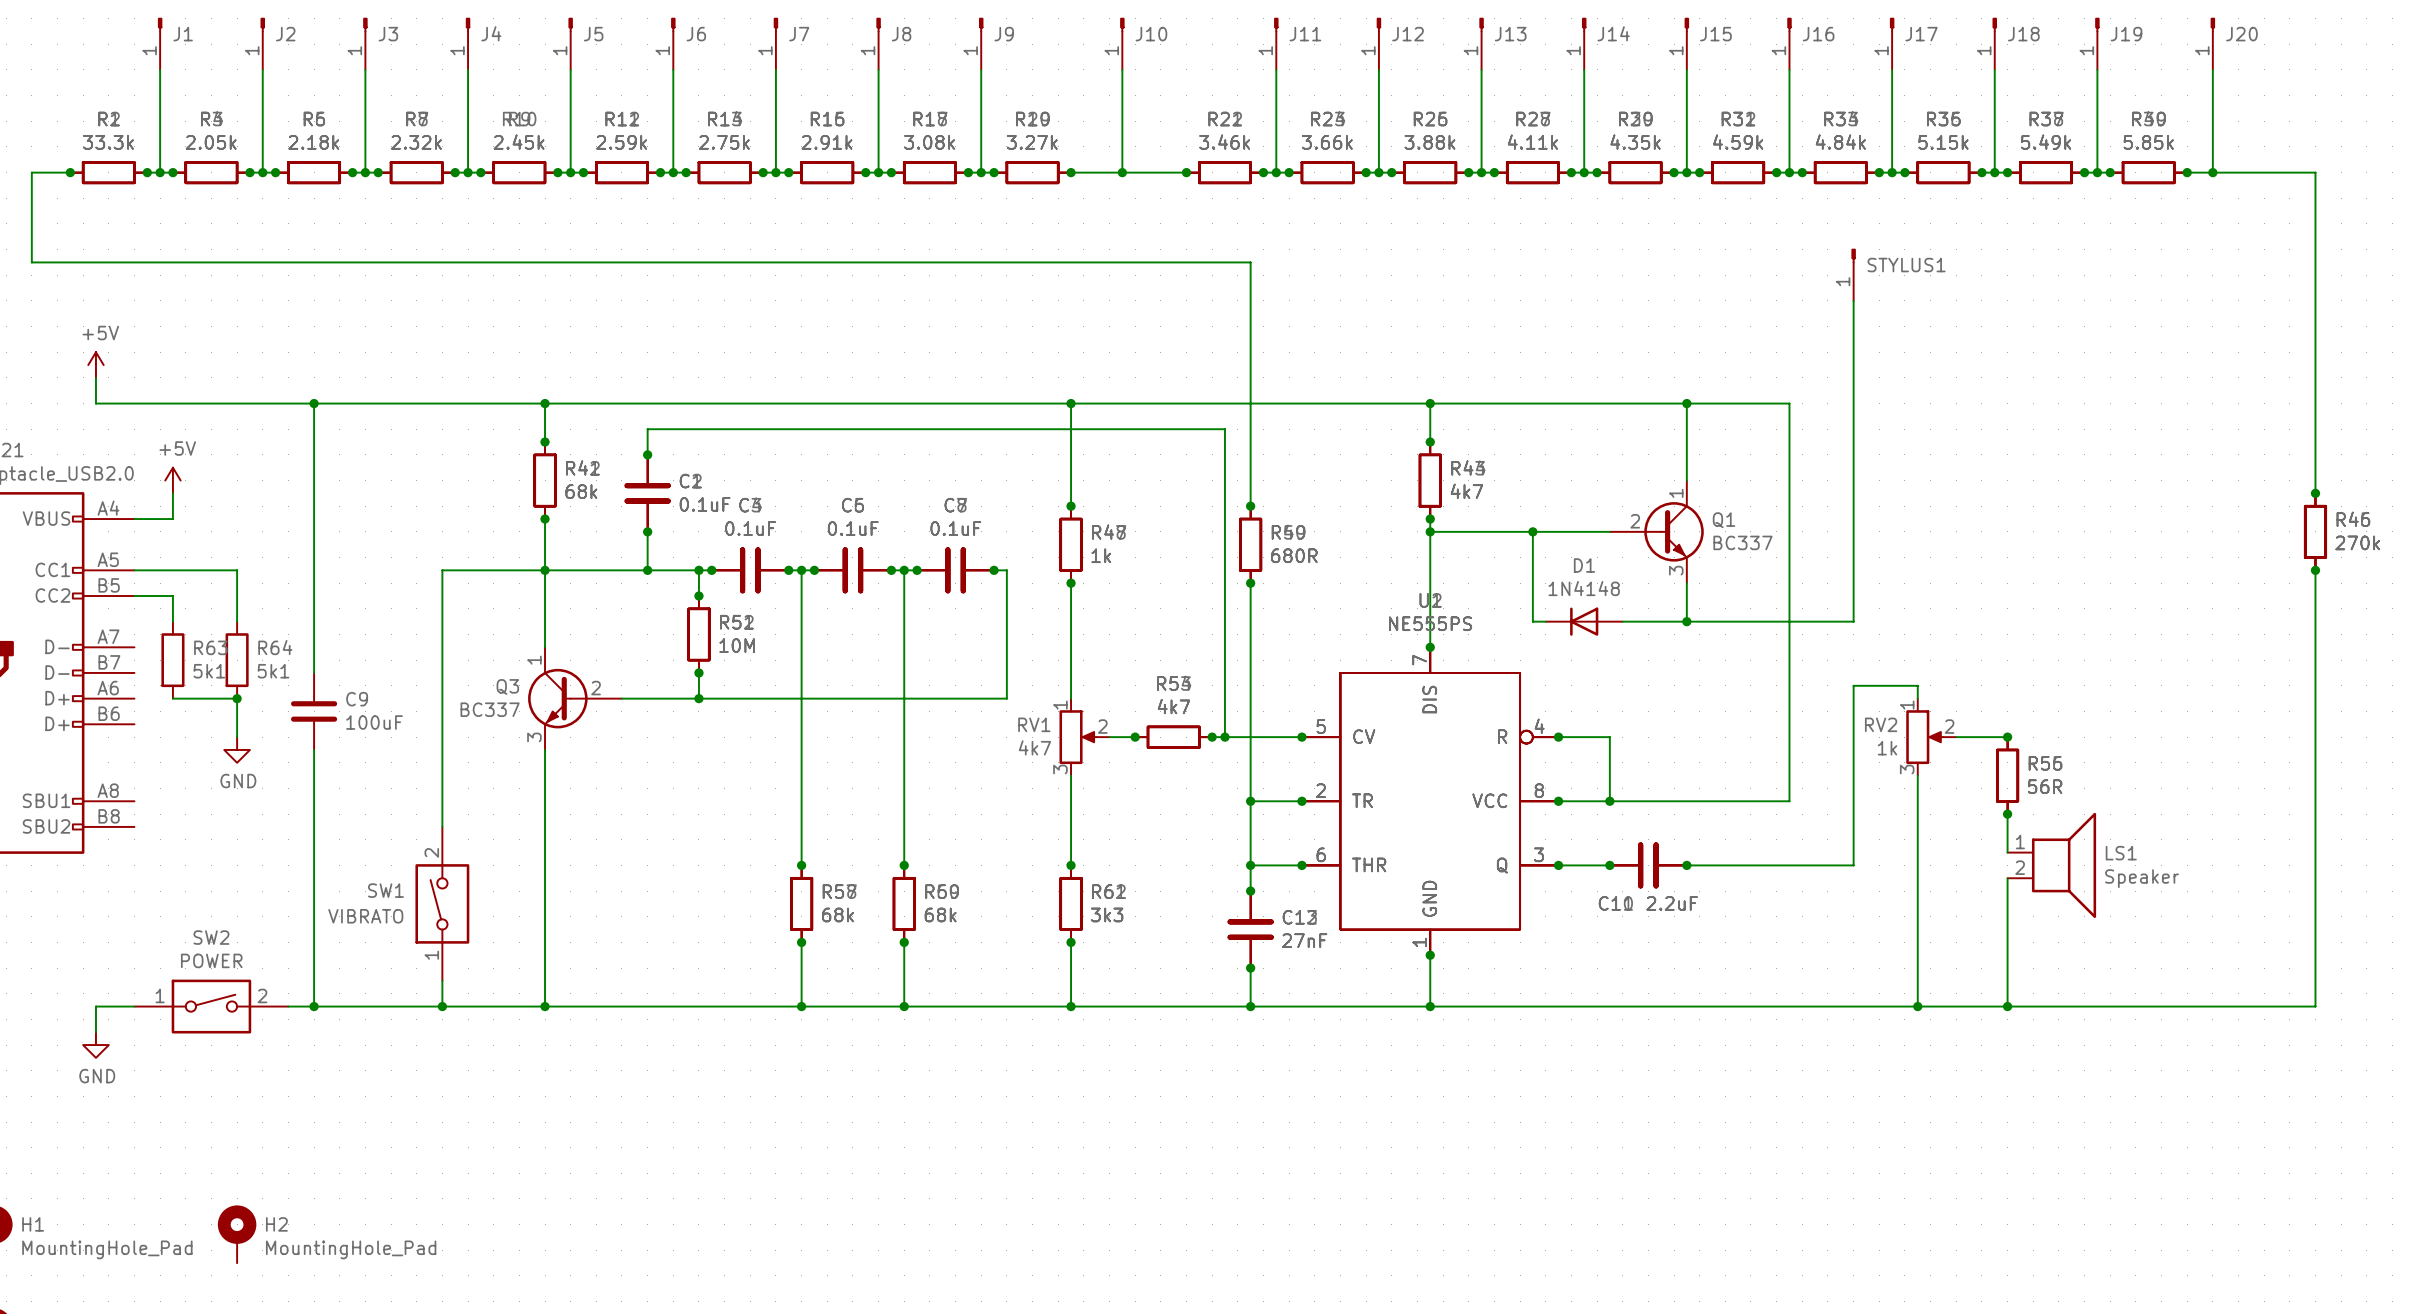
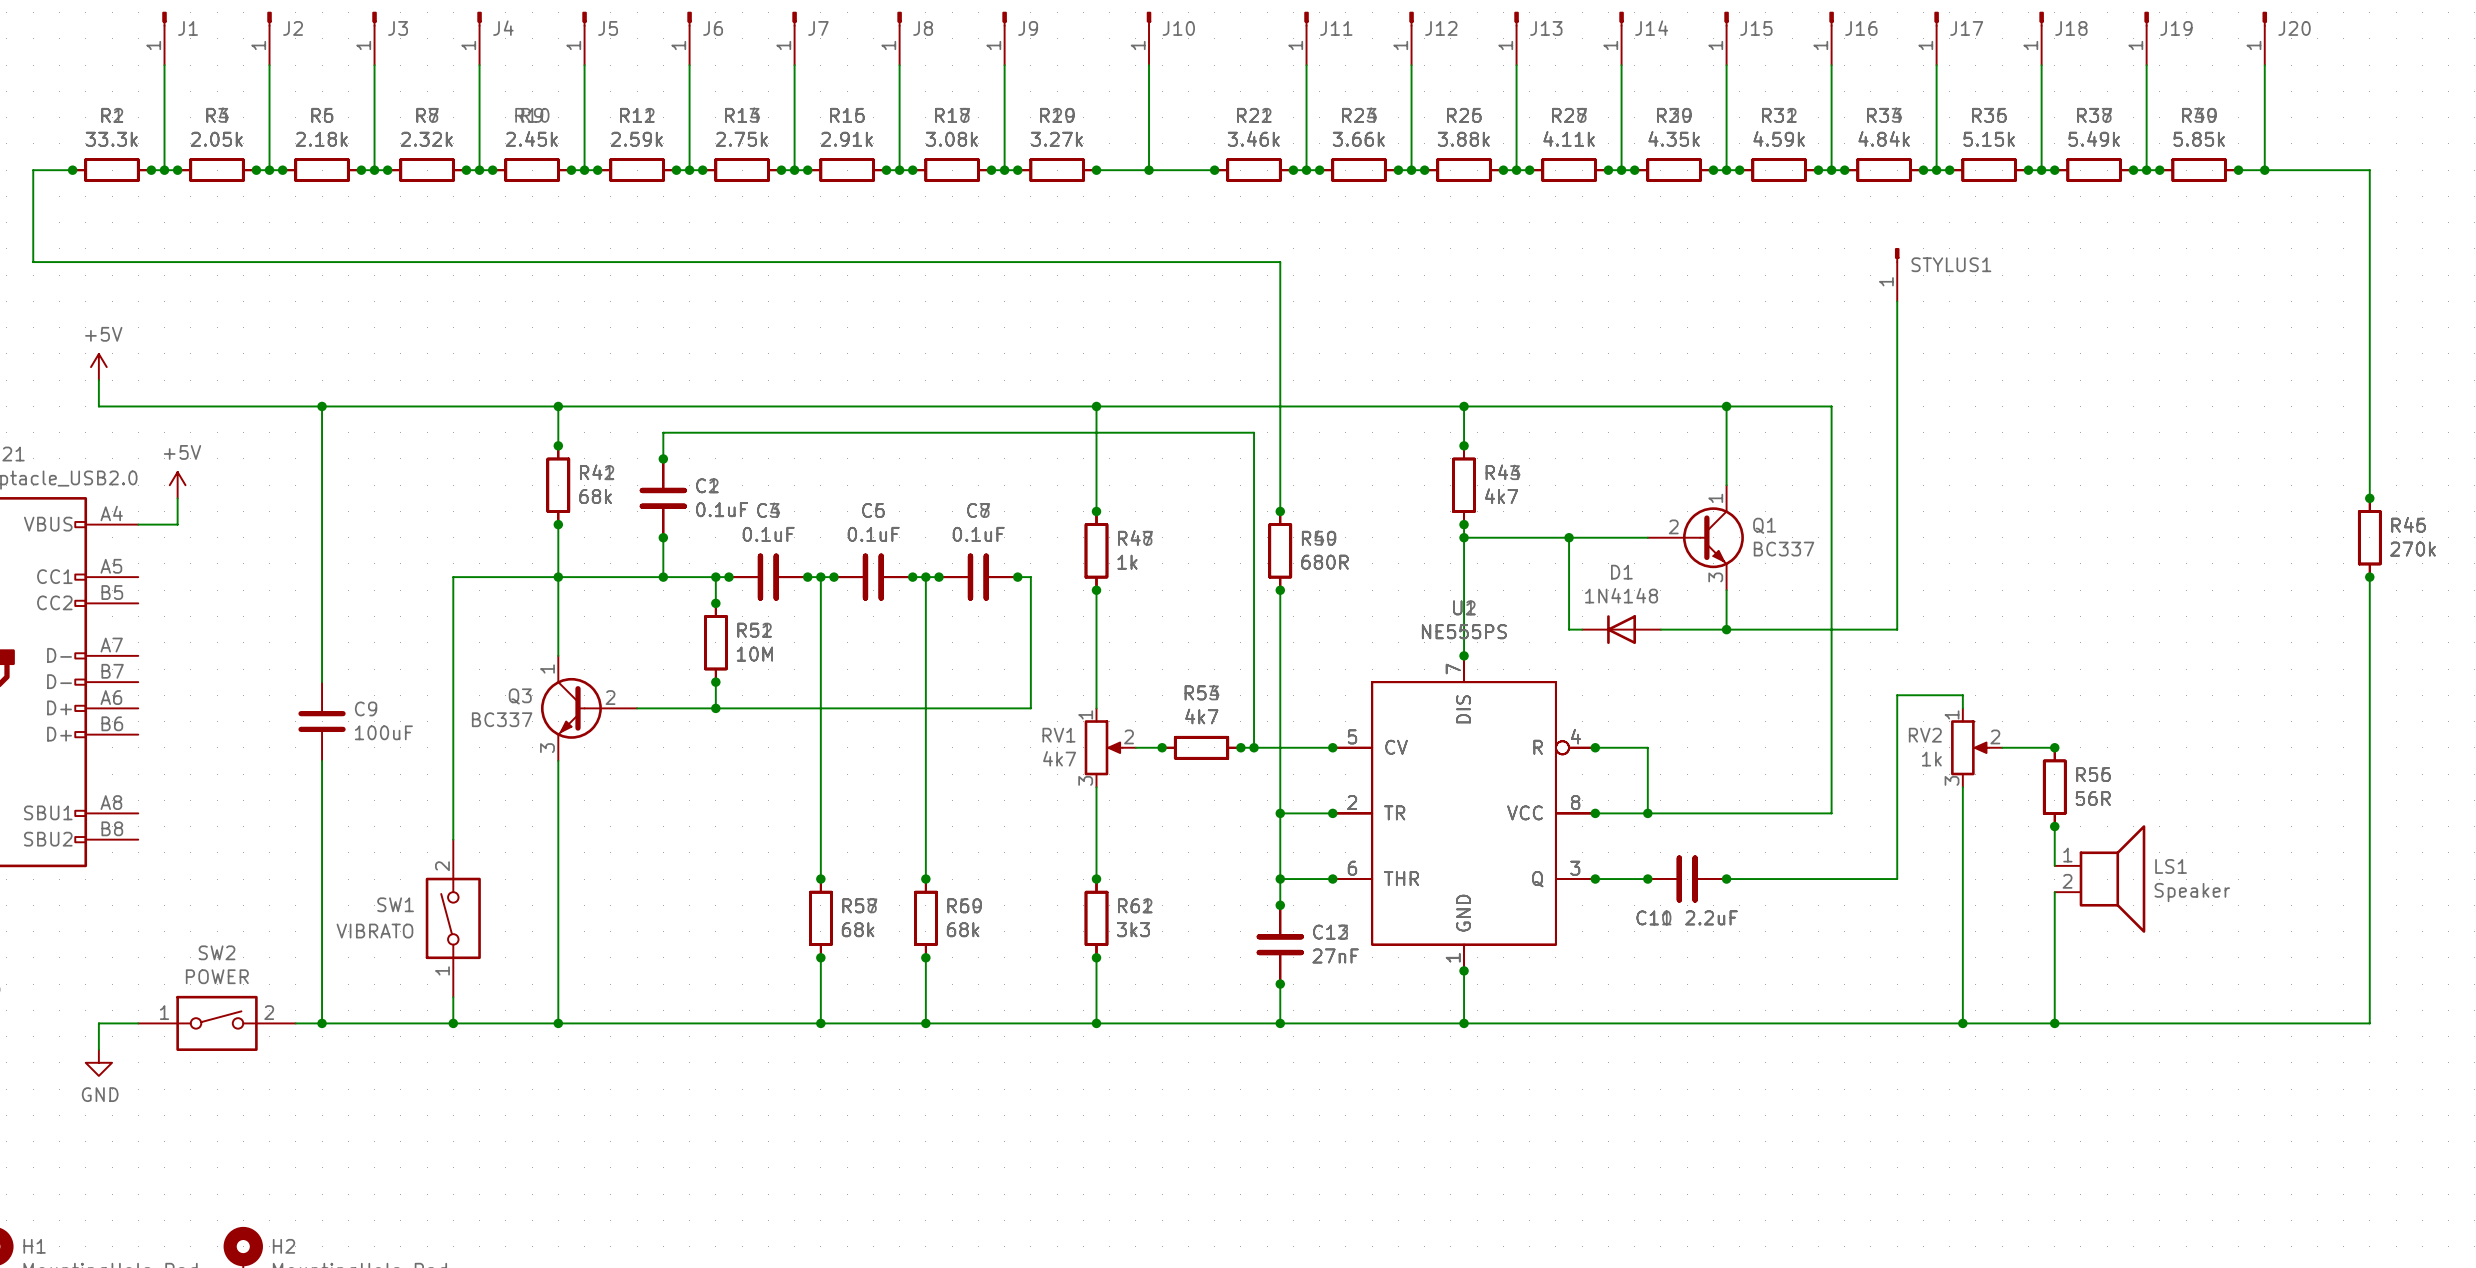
wire: (134, 570) (237, 570) (237, 621) -> none
wire: (134, 596) (172, 596) (172, 621) -> none
R63: 5k1 (172, 660) -> none
R64: 5k1 (237, 660) -> none
wire: (172, 698) (237, 698) (237, 737) -> none
junction: (237, 698) -> none
power symbol: GND (237, 749) -> none

